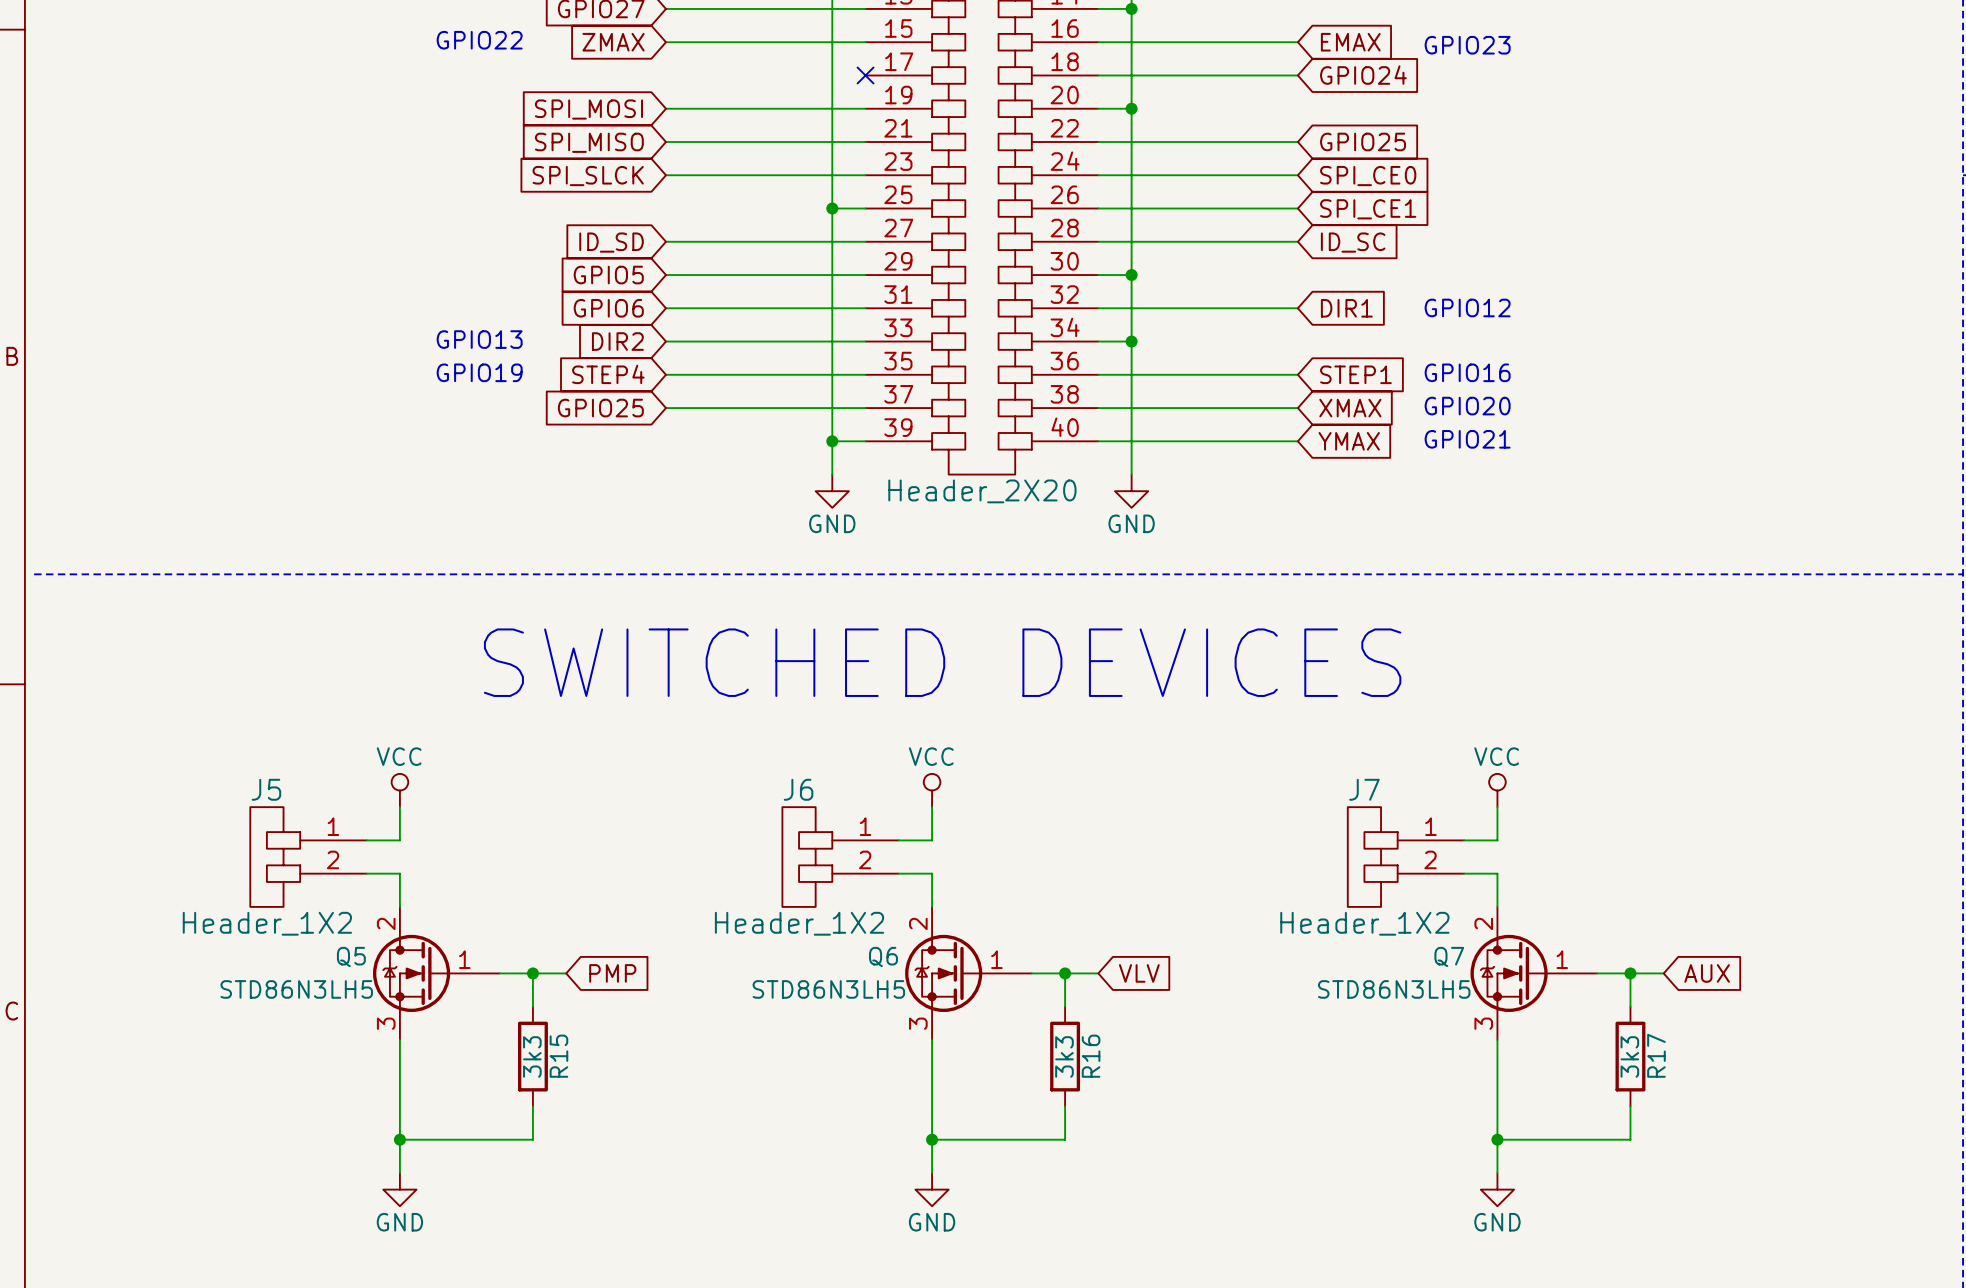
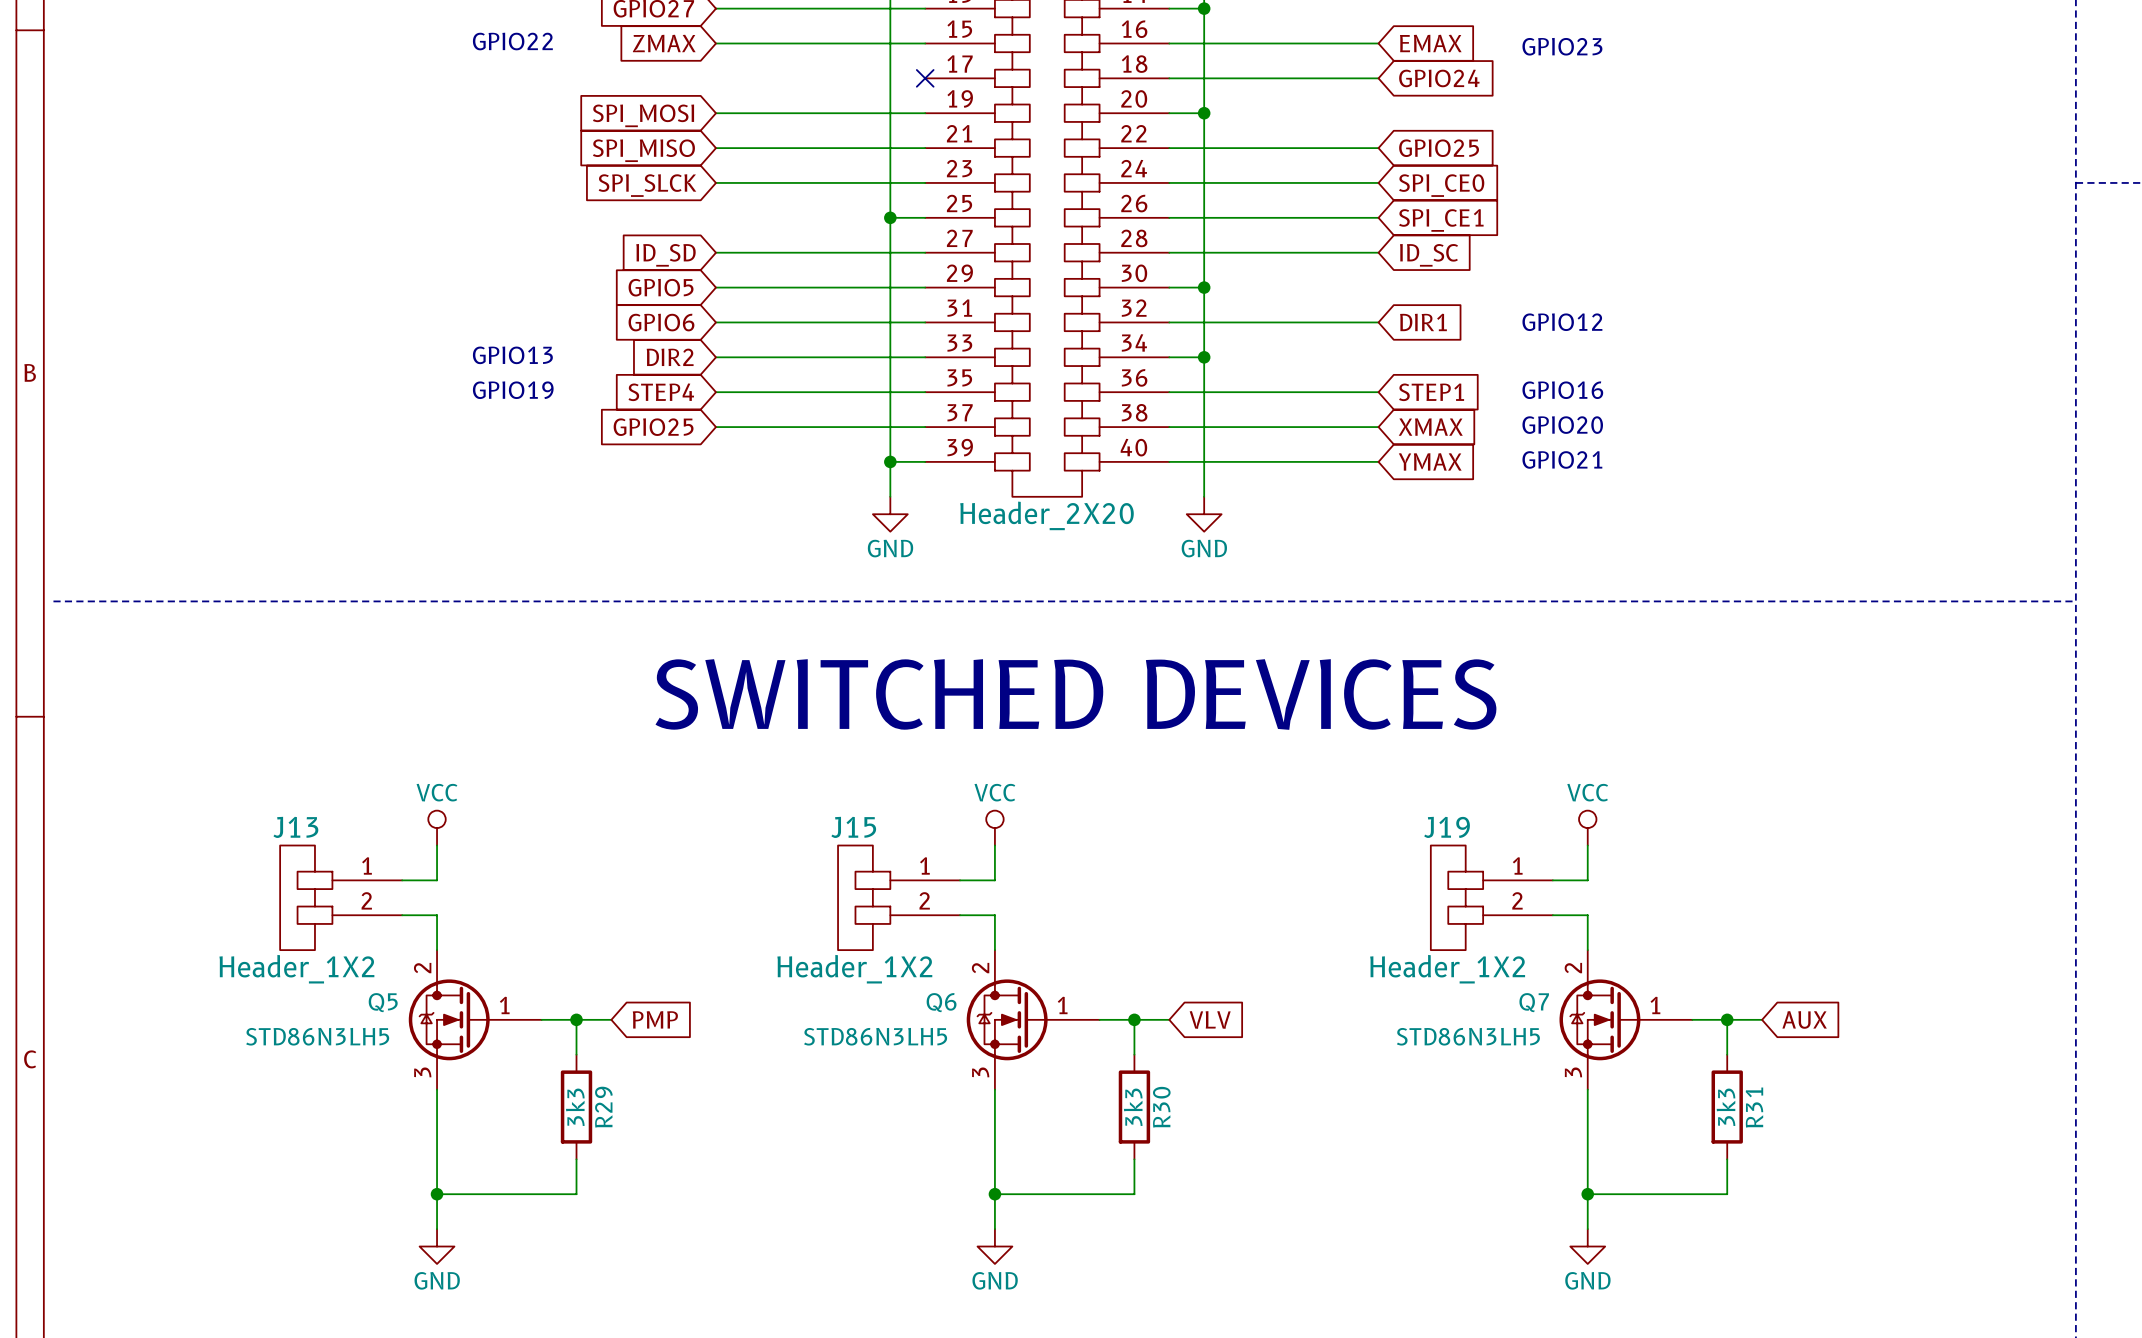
J5 name: J5 (266, 789) -> J13 (295, 827)
J6 name: J6 (798, 789) -> J15 (853, 827)
J7 name: J7 (1364, 789) -> J19 (1447, 827)
R17 name: R17 (1656, 1055) -> R31 (1754, 1107)
R15 name: R15 (558, 1056) -> R29 (603, 1107)
R16 name: R16 (1091, 1056) -> R30 (1161, 1107)

